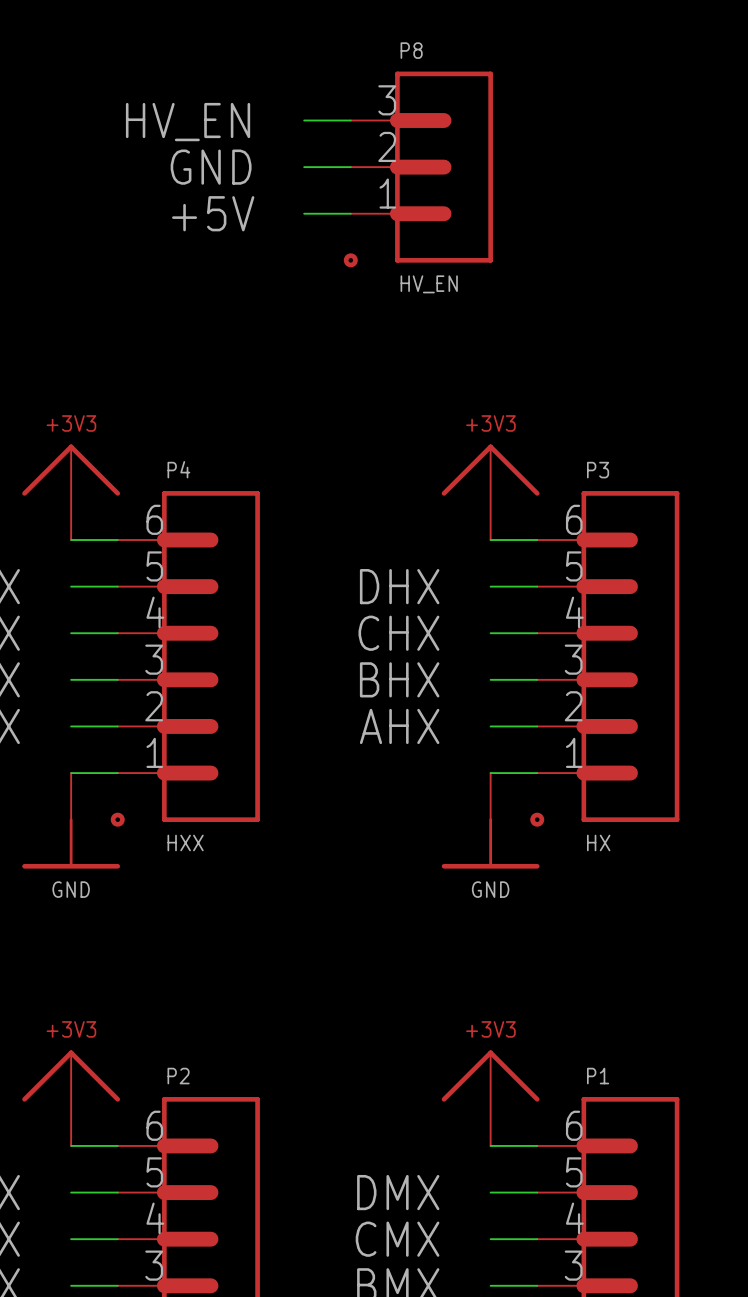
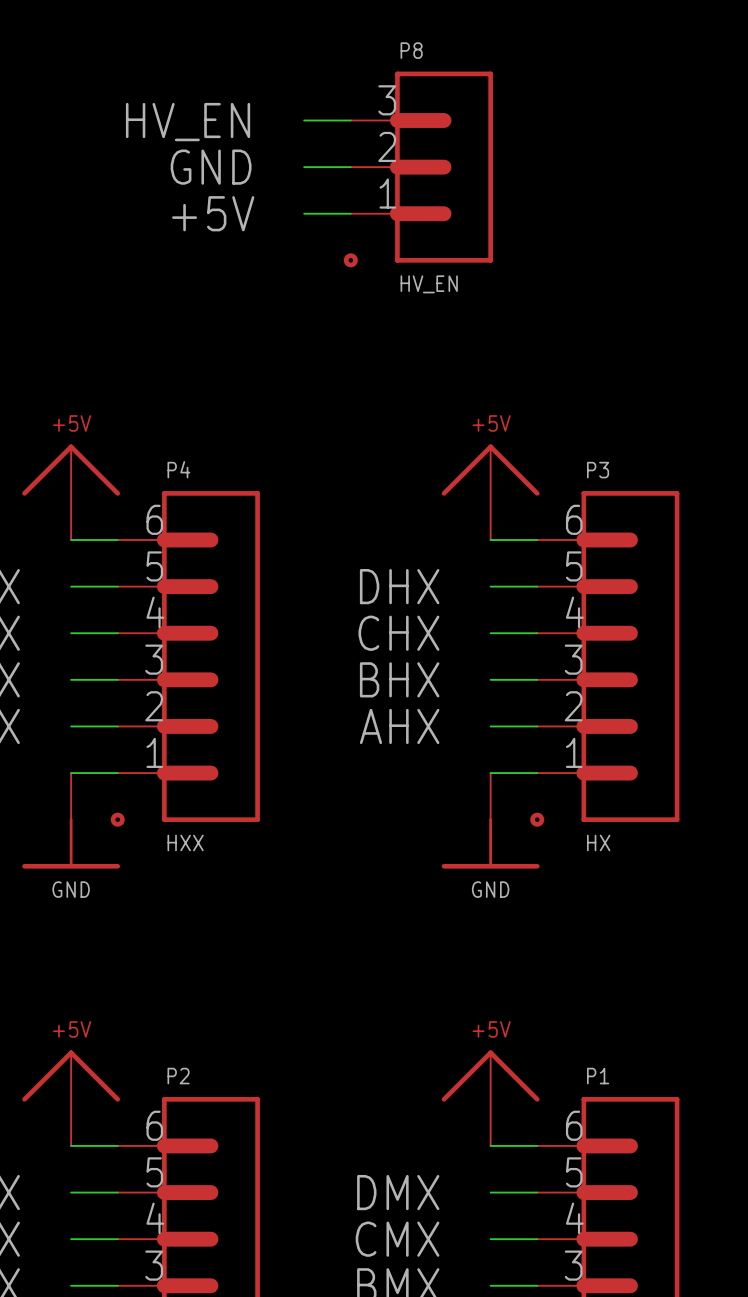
power symbol text: +3V3 (71, 423) -> +5V (72, 423)
power symbol text: +3V3 (490, 423) -> +5V (491, 423)
power symbol text: +3V3 (71, 1029) -> +5V (72, 1029)
power symbol text: +3V3 (490, 1029) -> +5V (491, 1029)

